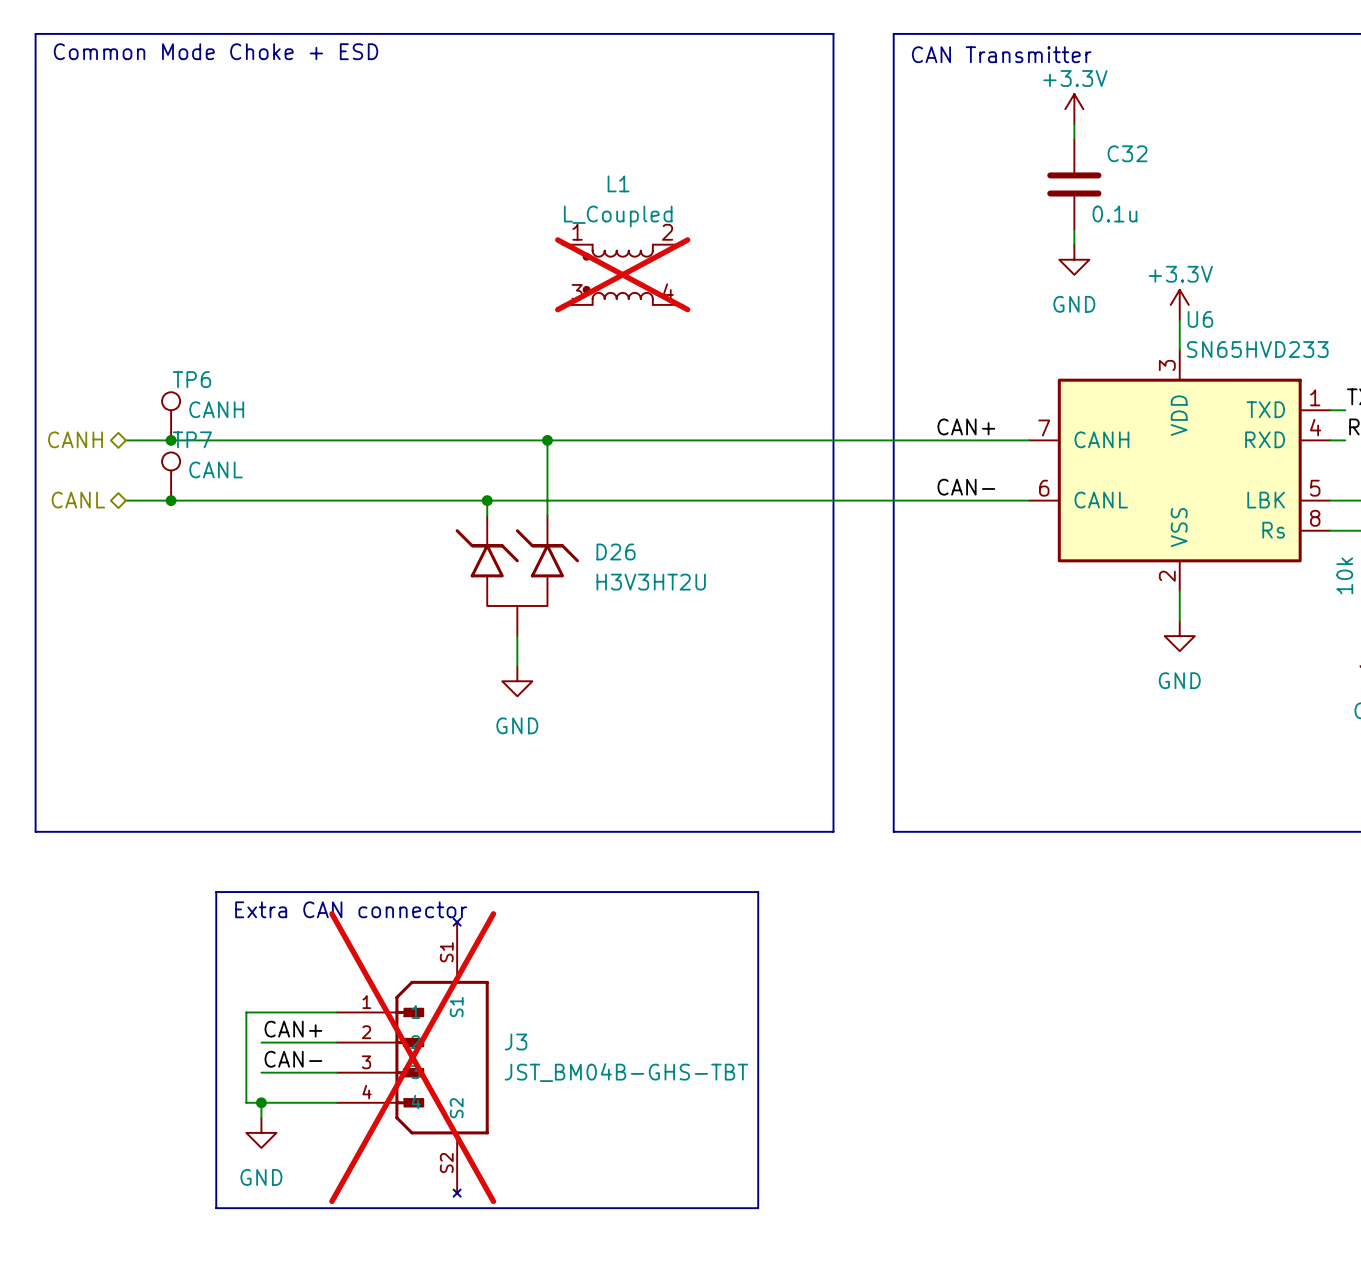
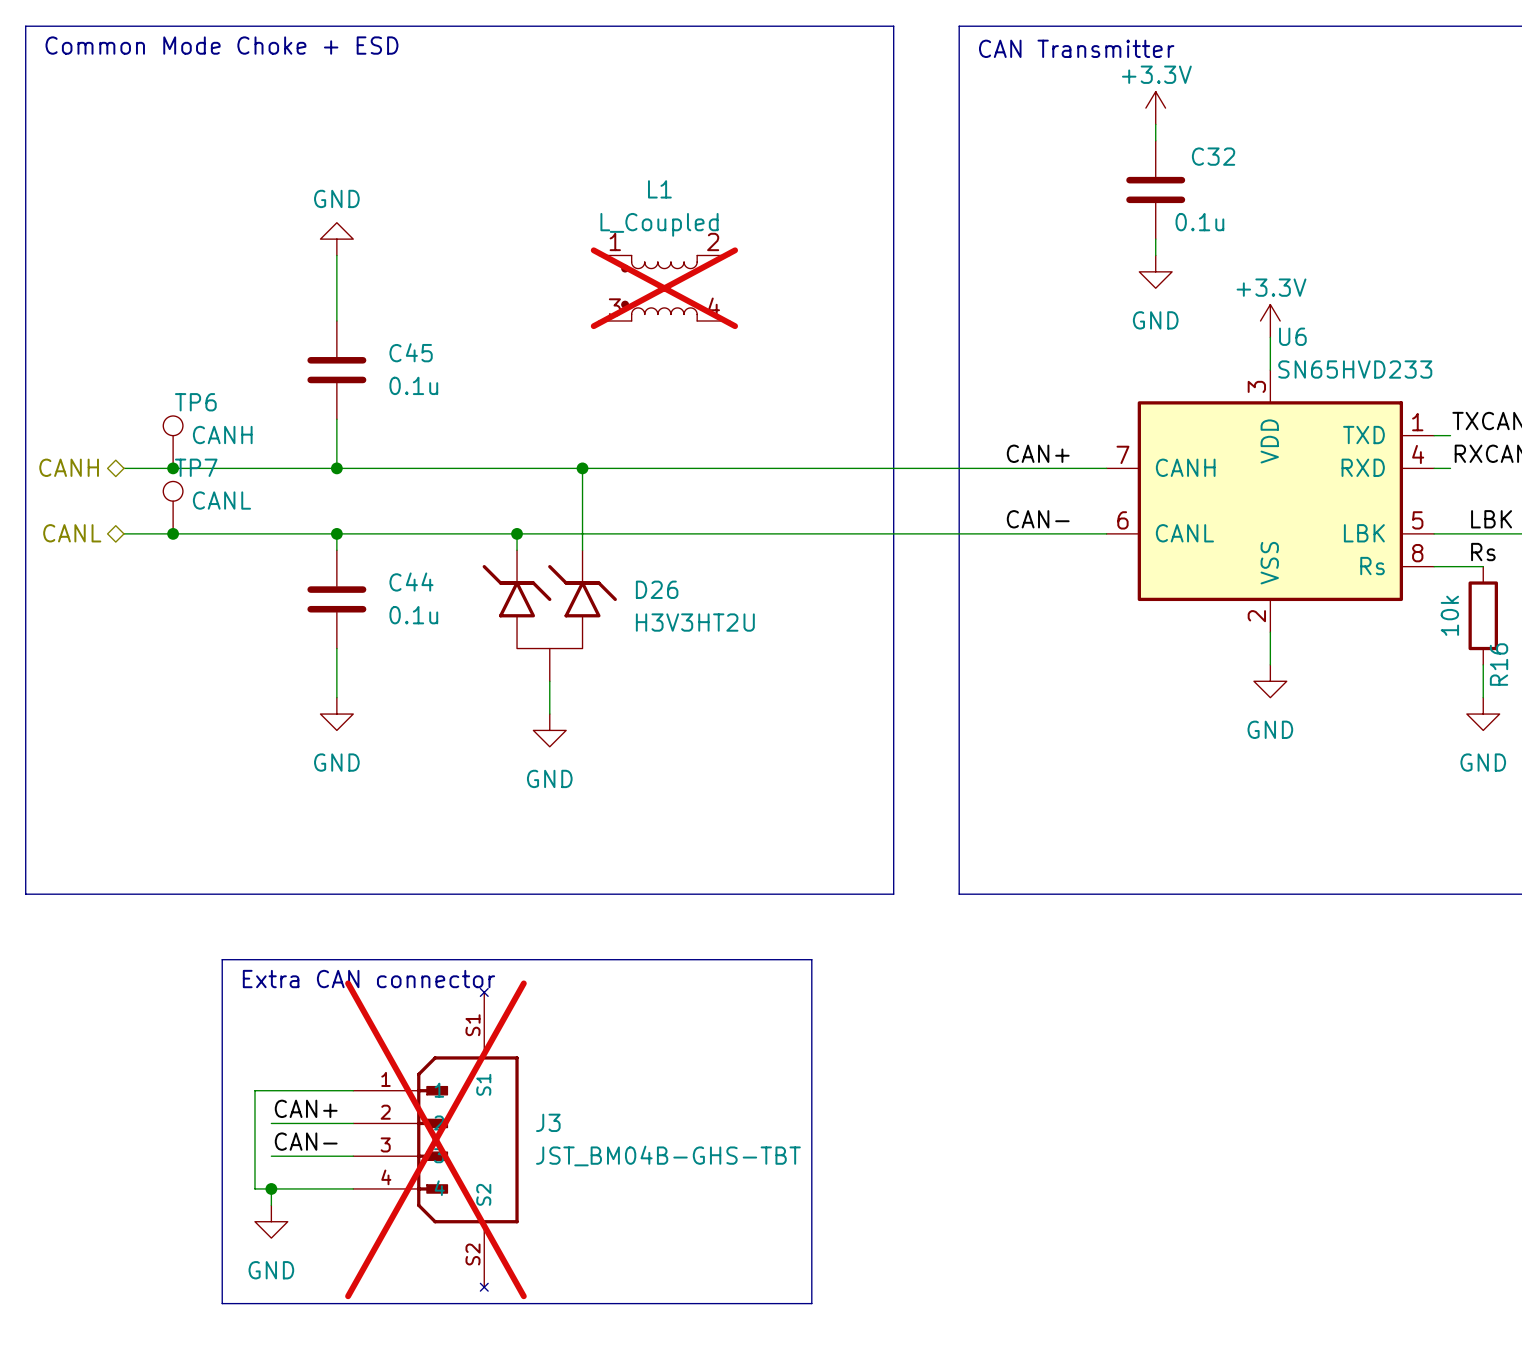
power symbol: none -> GND (336, 239)
wire: none -> (336, 255) (336, 320)
C45: none -> 0.1u (336, 370)
wire: none -> (336, 419) (336, 468)
junction: none -> (336, 468)
wire: none -> (336, 533) (336, 550)
junction: none -> (336, 533)
C44: none -> 0.1u (336, 599)
wire: none -> (336, 648) (336, 697)
power symbol: none -> GND (336, 714)

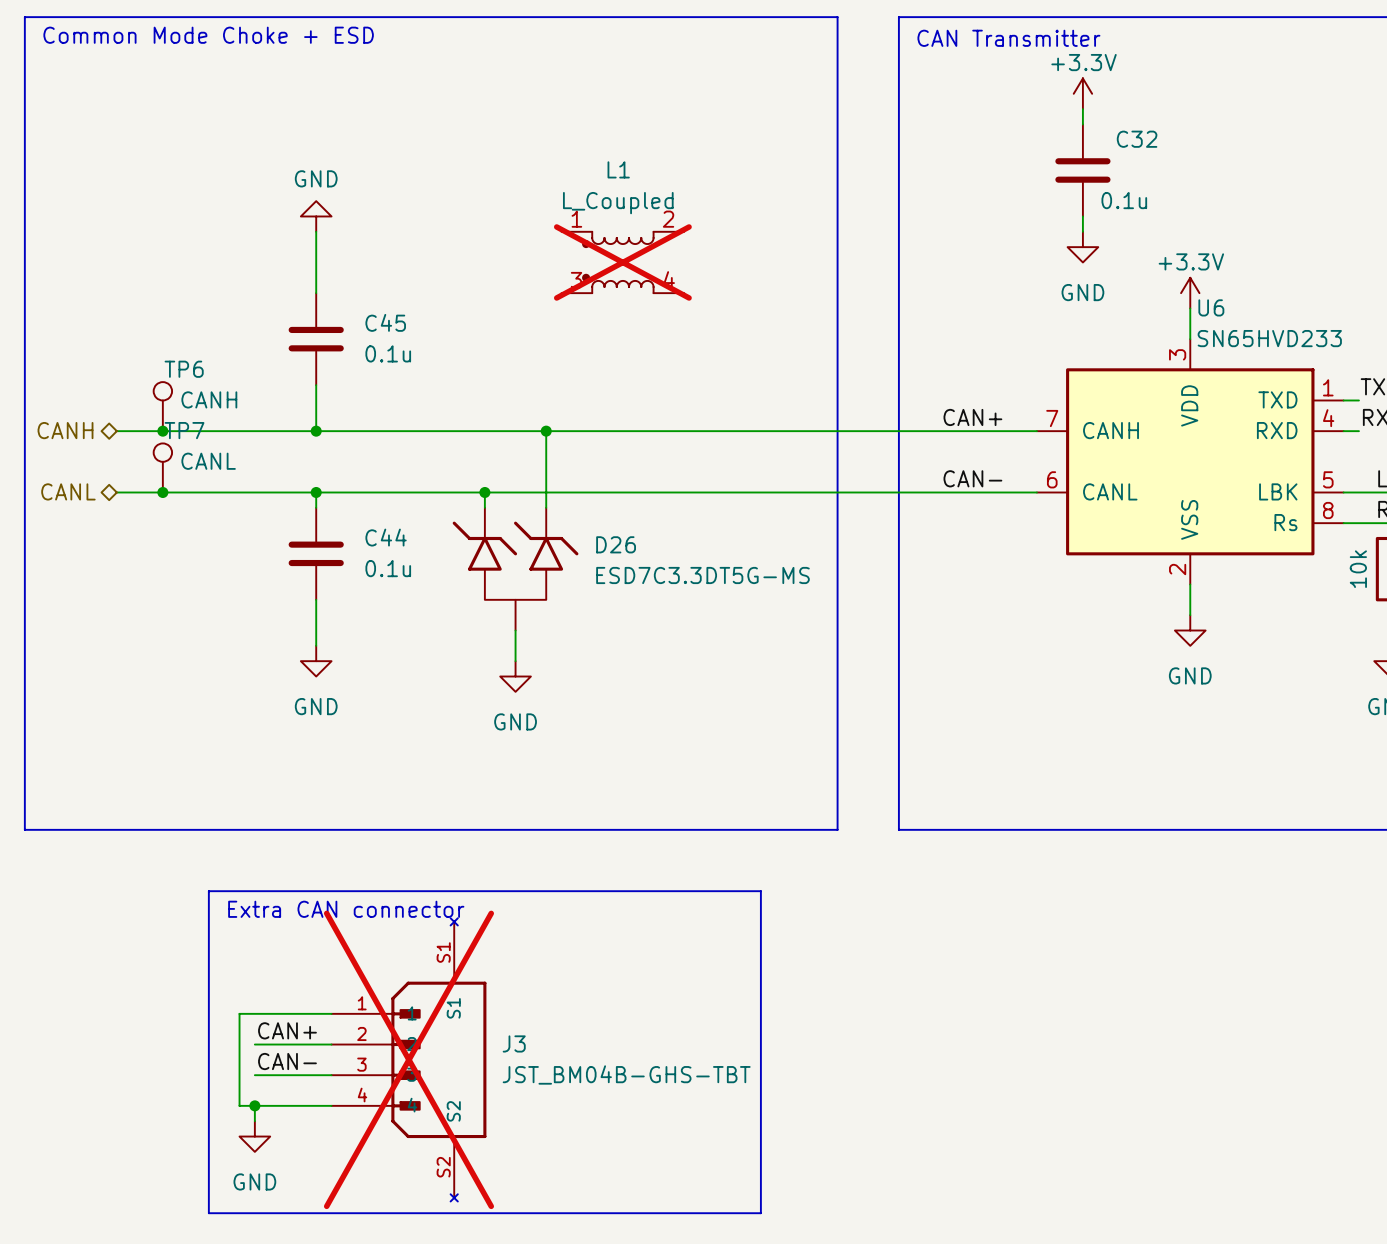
D26 value: H3V3HT2U (695, 622) -> ESD7C3.3DT5G-MS (702, 575)

